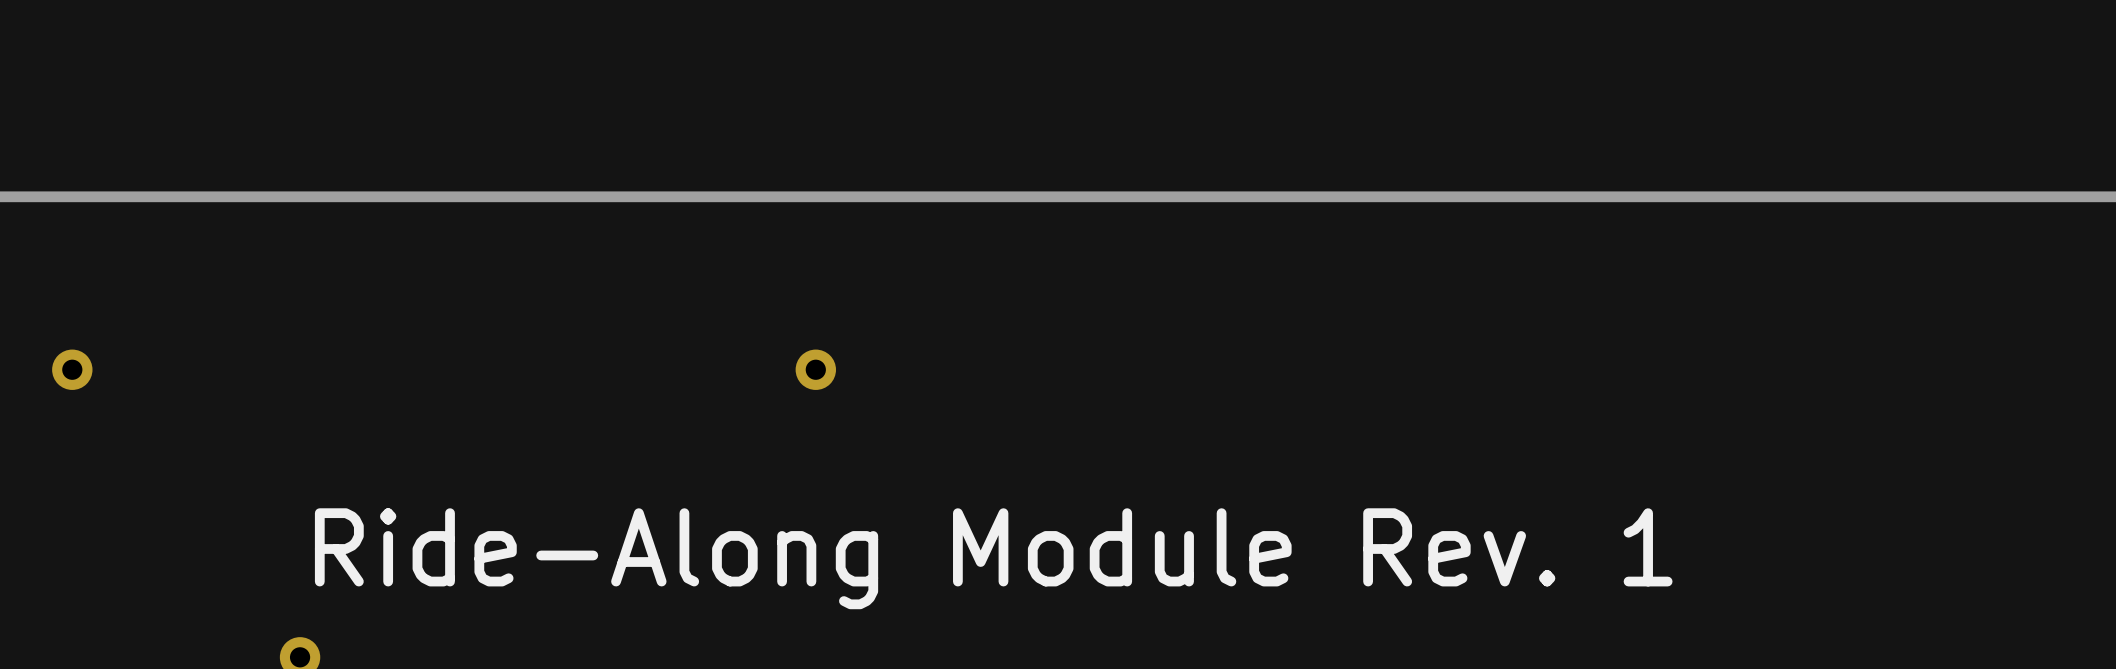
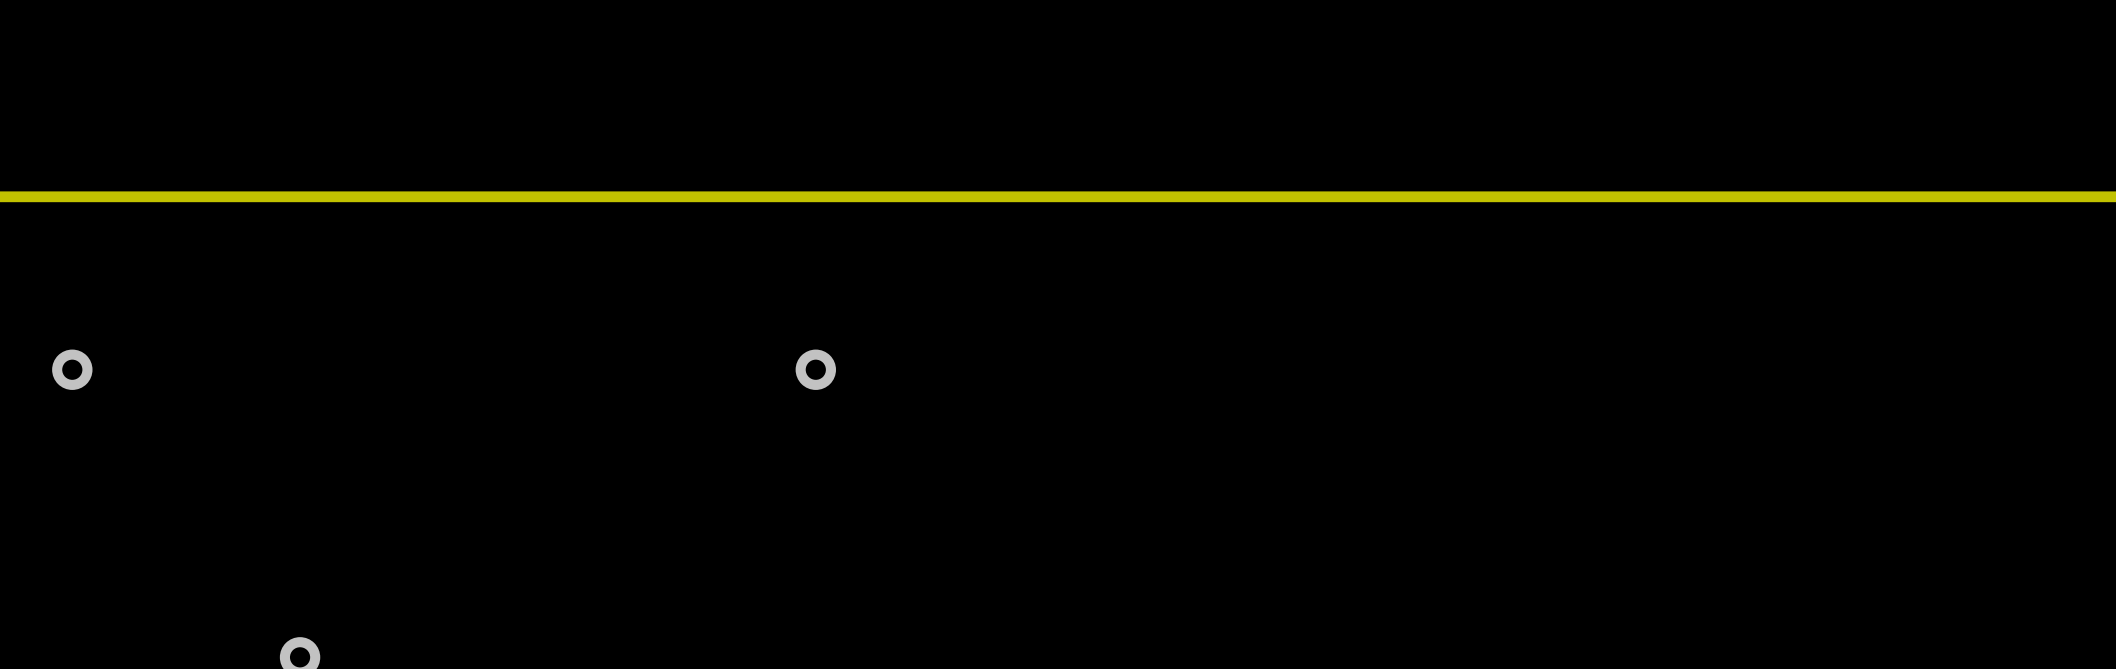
text: Ride-Along Module Rev. 1 (993, 558) -> none

